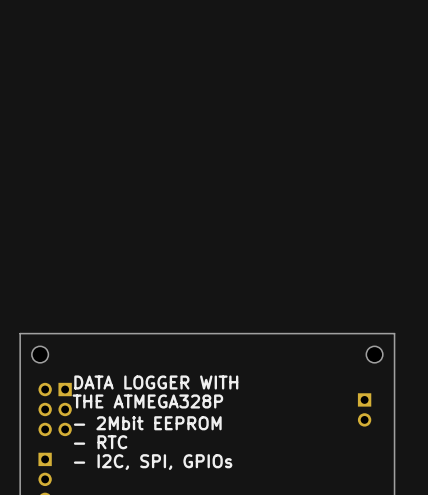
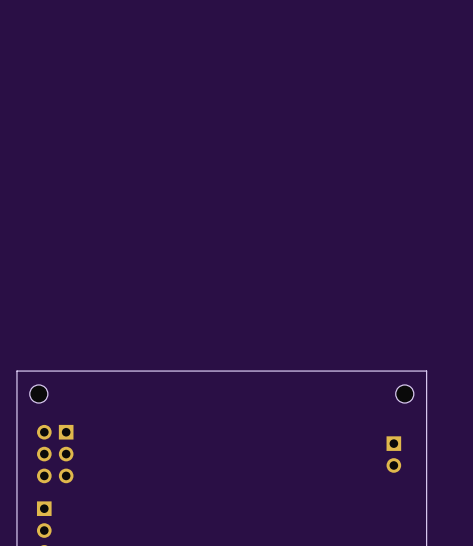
text: DATA LOGGER WITH (156, 382) -> none
text: THE ATMEGA328P (147, 401) -> none
text: - 2Mbit EEPROM (147, 423) -> none
text: - RTC (100, 442) -> none
text: - I2C, SPI, GPIOs (153, 462) -> none

